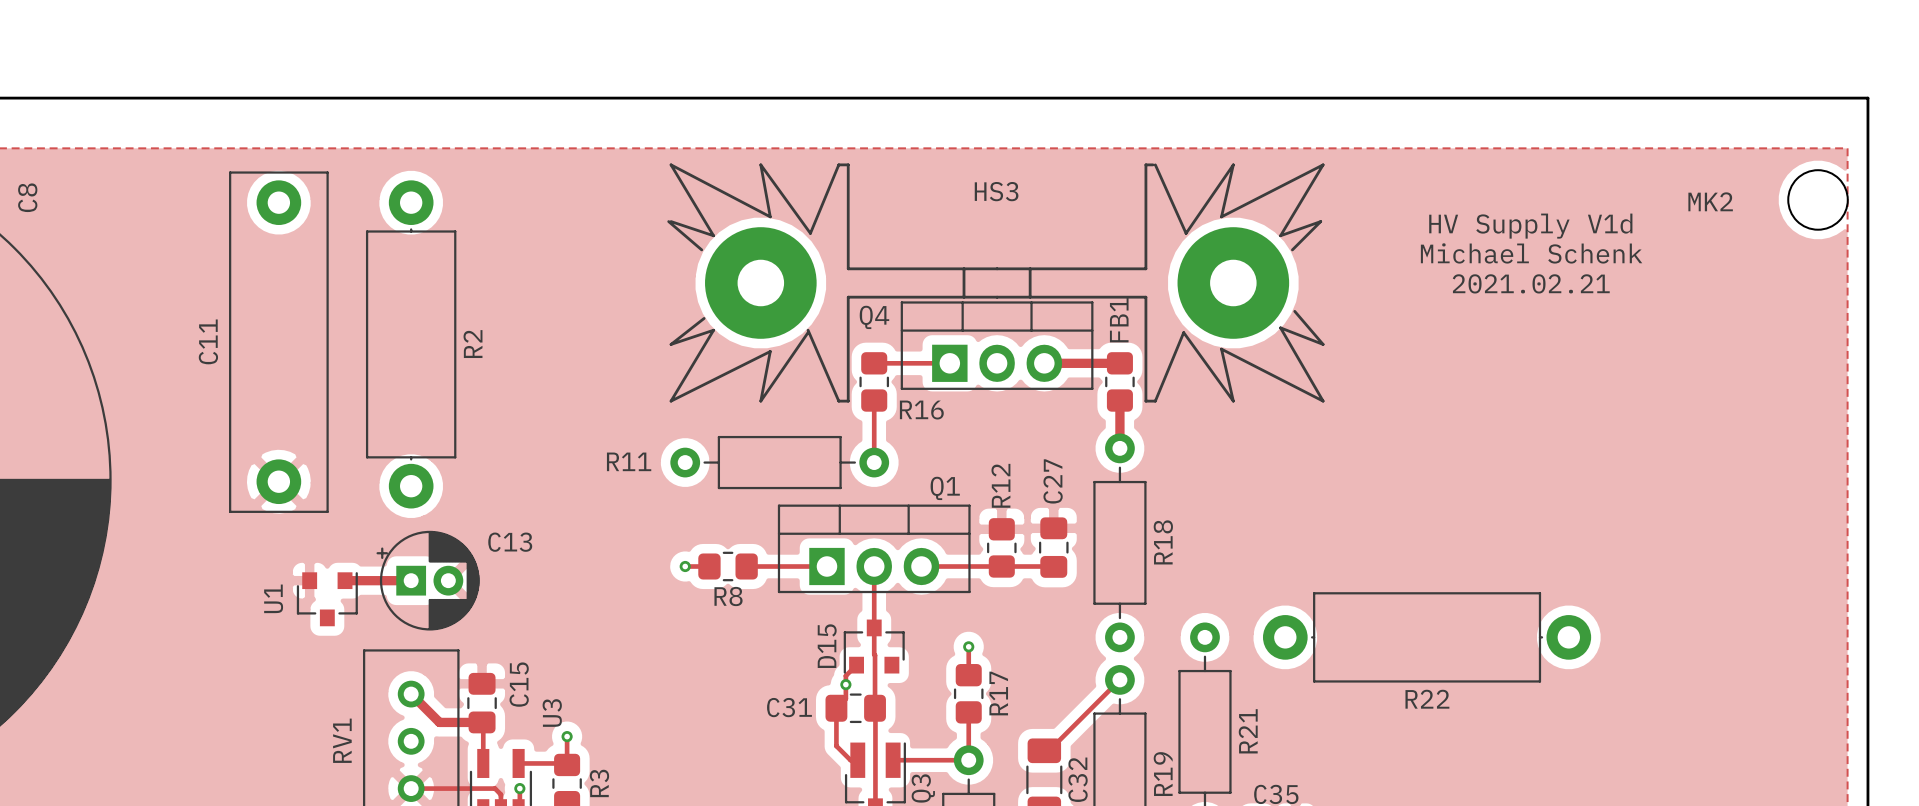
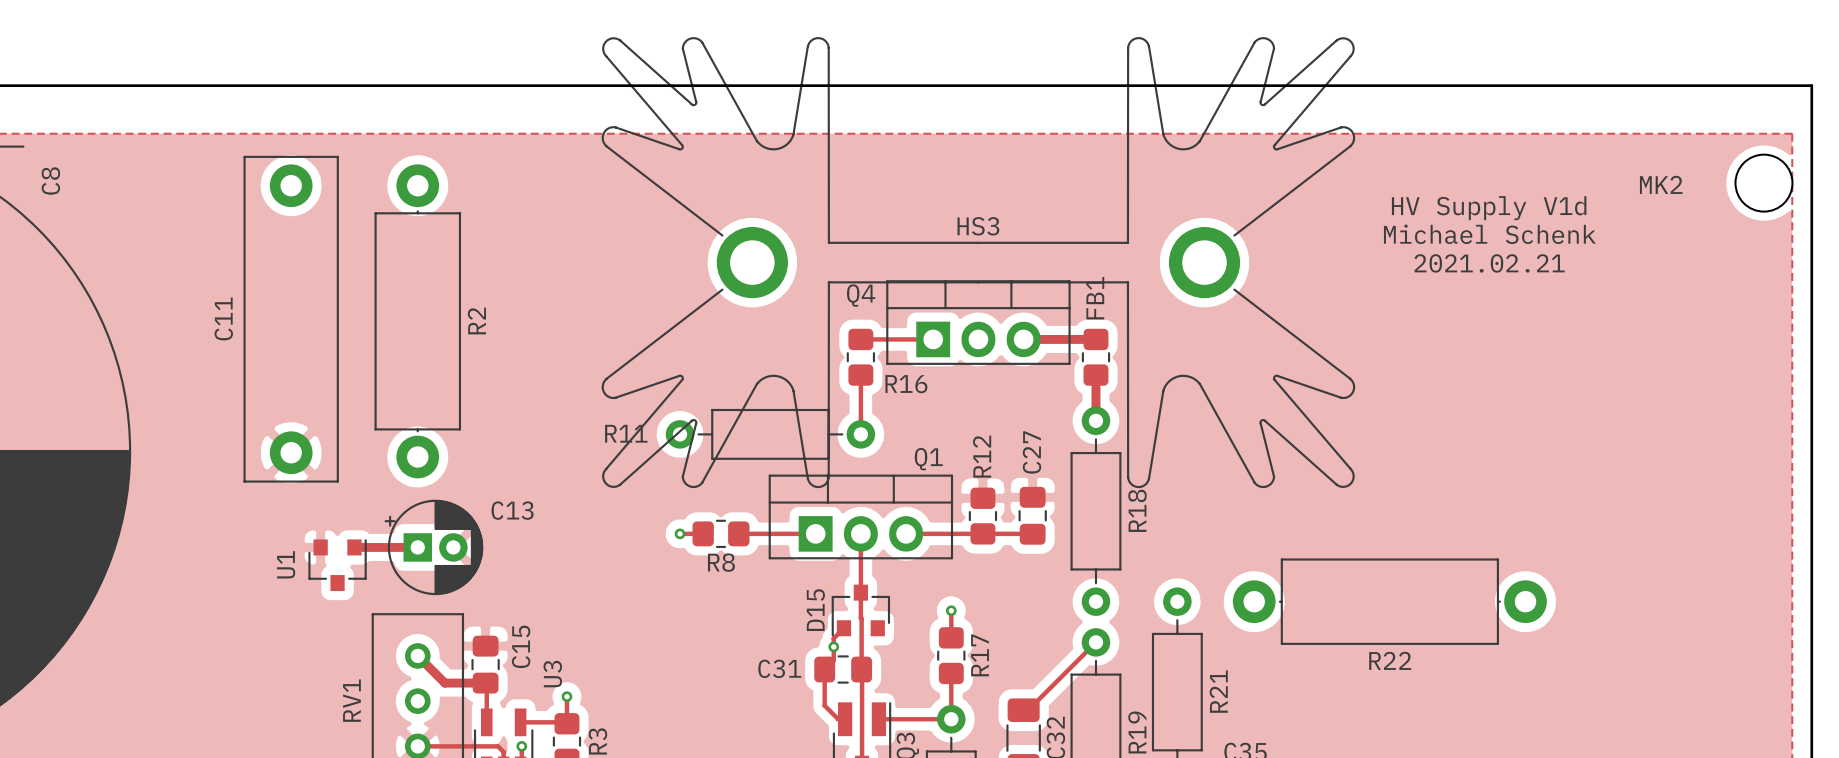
HS3 footprint: [667, 163, 1325, 403] -> [601, 37, 1356, 489]
HS3 name position: HS3 (996, 191) -> HS3 (978, 226)

